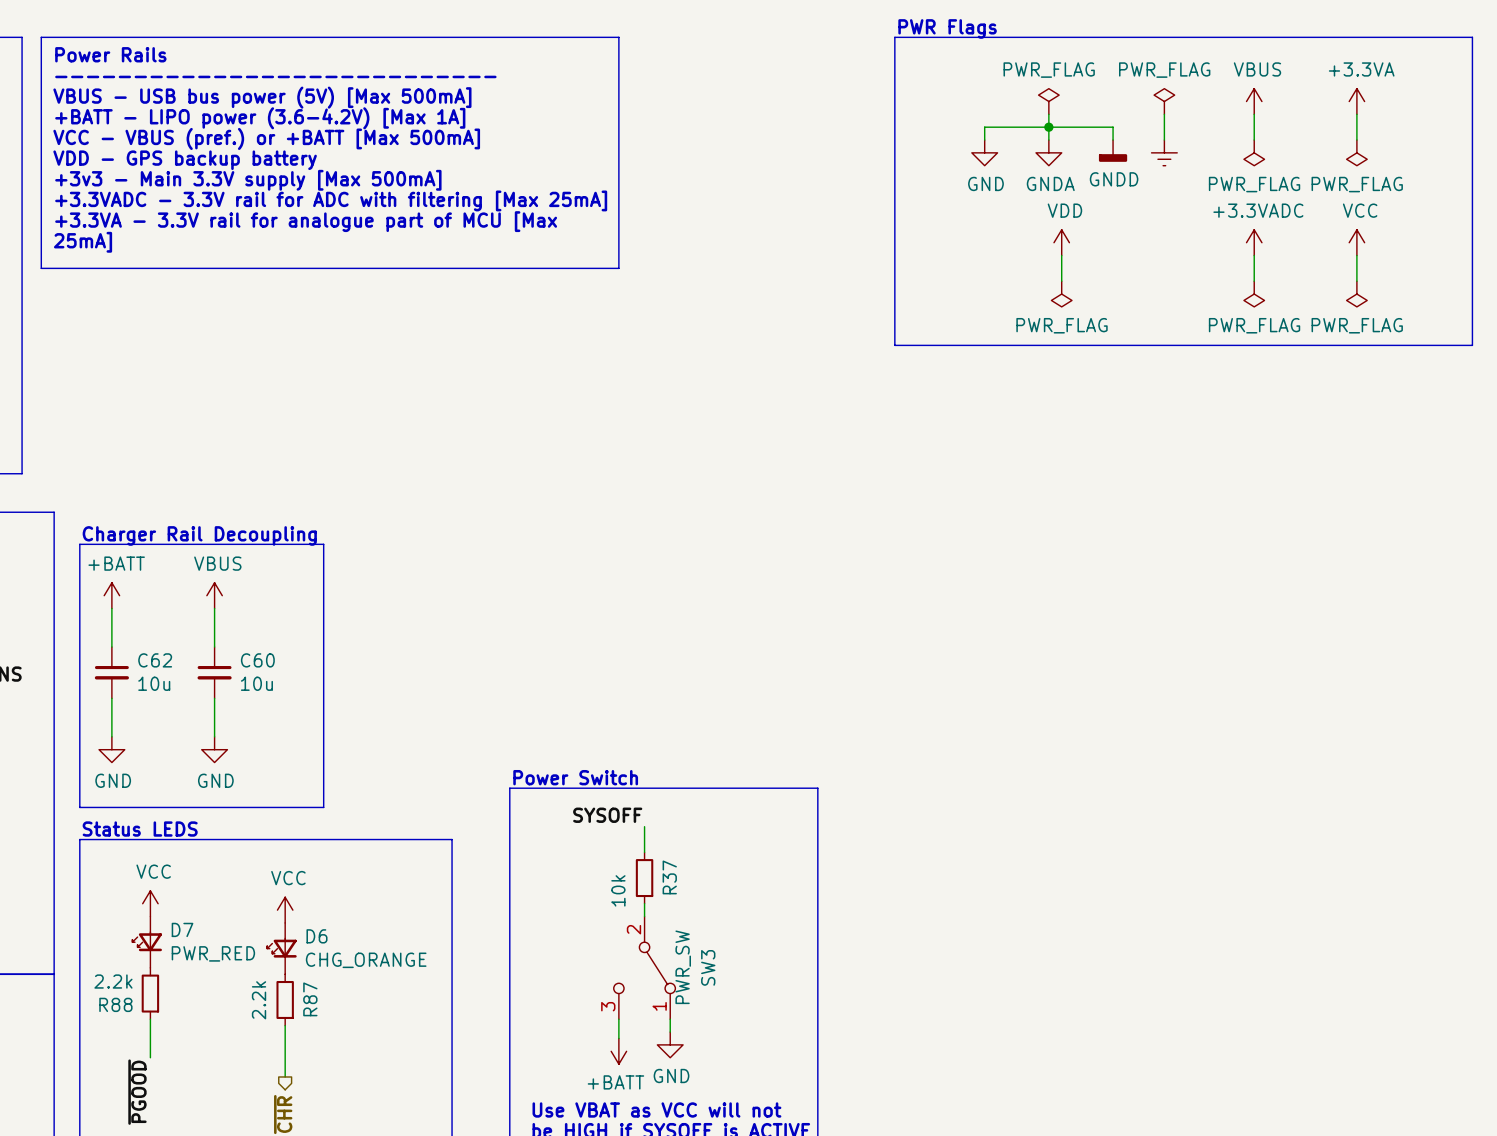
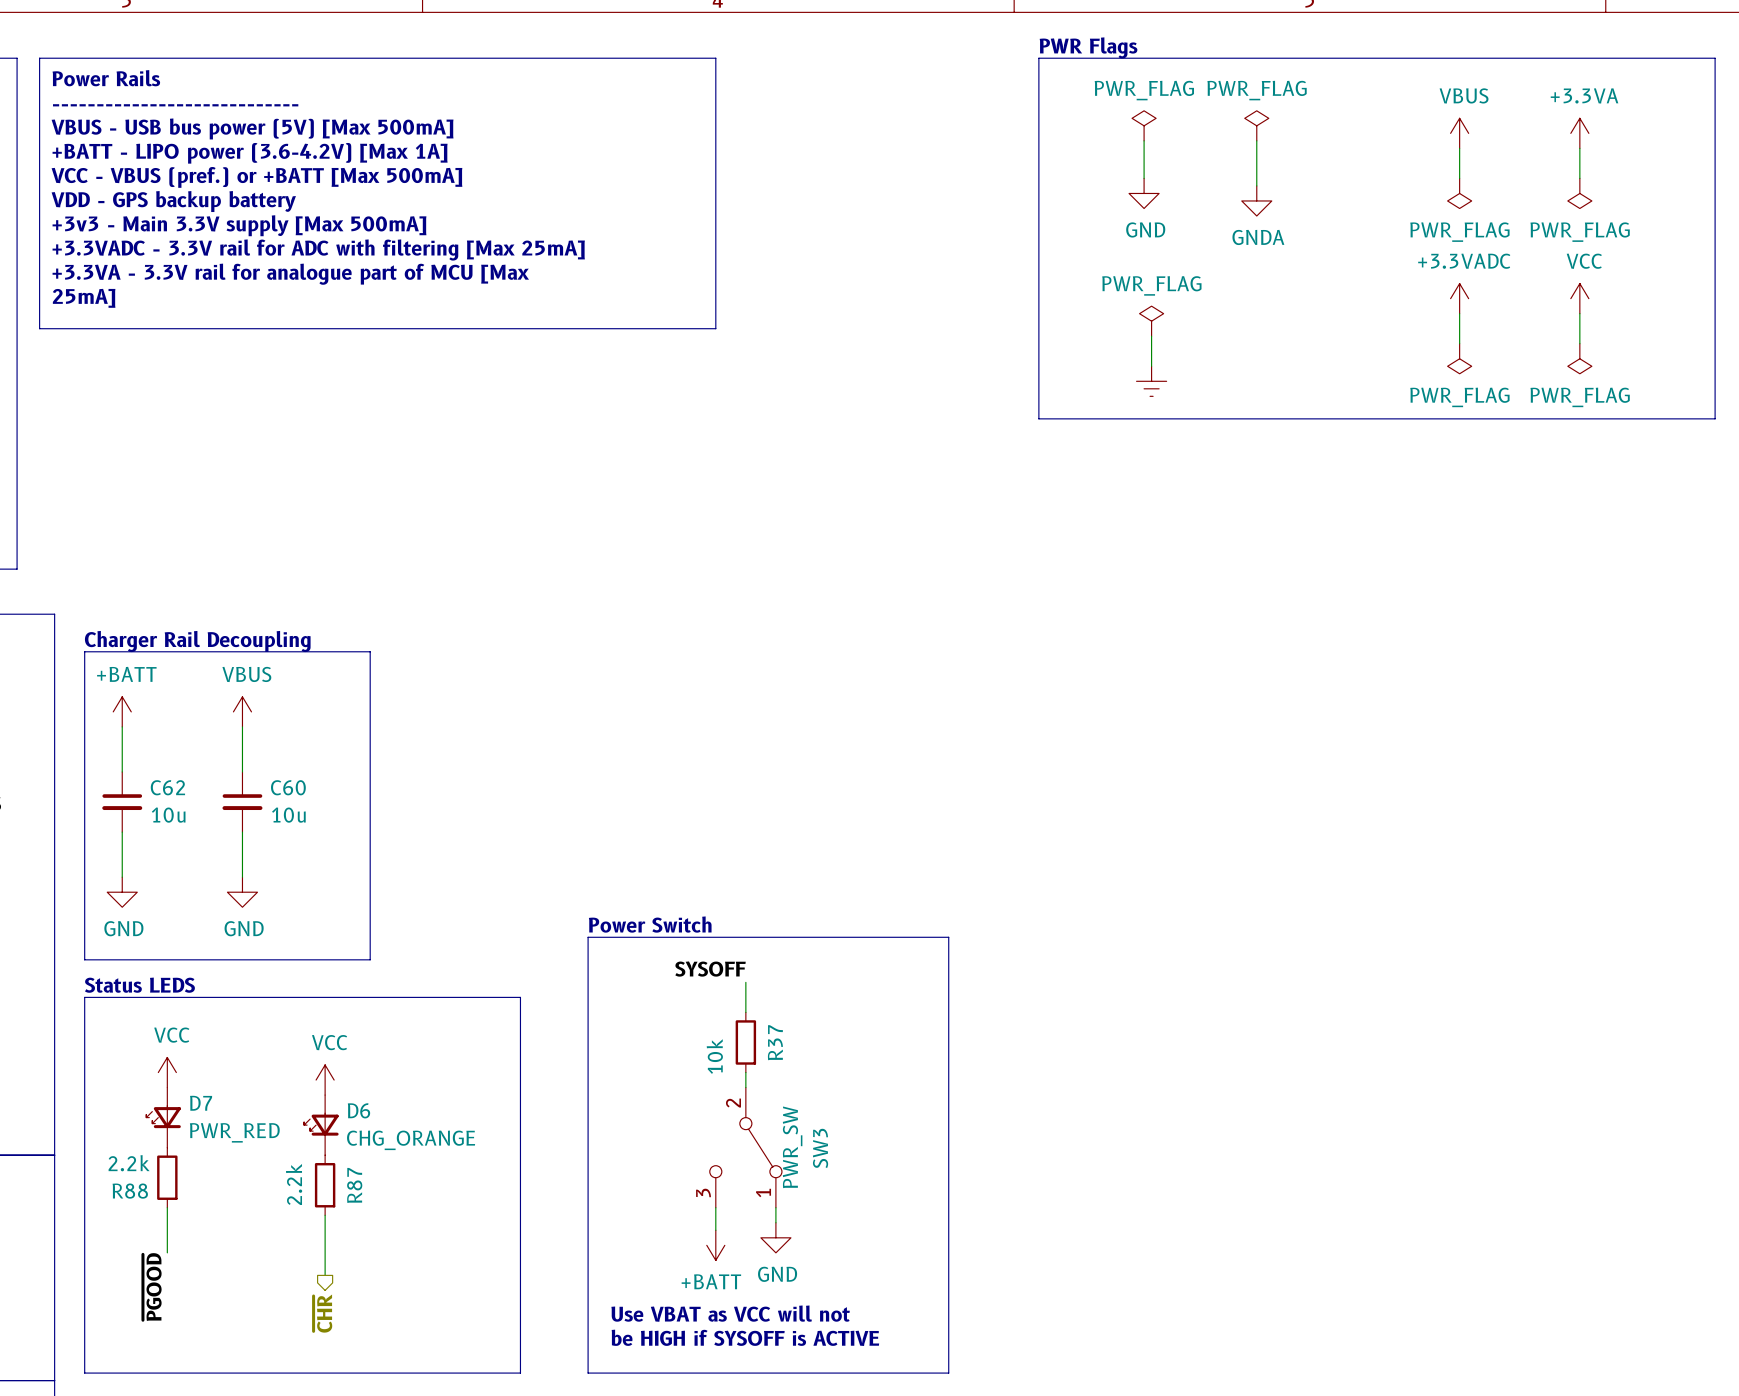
power symbol: none -> PWR_FLAG (1144, 125)
power symbol: none -> PWR_FLAG (1256, 125)
power symbol: PWR_FLAG (1048, 101) -> none
power symbol: PWR_FLAG (1164, 101) -> none
wire: none -> (1256, 140) (1256, 185)
wire: (1048, 114) (1048, 140) -> none
wire: (1164, 114) (1164, 140) -> none
wire: (984, 127) (1113, 127) (1113, 140) -> (1144, 163) (1144, 140)
junction: (1048, 127) -> none
power symbol: GNDD (1113, 150) -> none
power symbol position: GNDA (1048, 152) -> GNDA (1256, 200)
power symbol position: (1164, 152) -> (1151, 381)
power symbol: VDD (1061, 242) -> none
wire: (1061, 255) (1061, 281) -> (1151, 336) (1151, 366)
power symbol rotation: 0° (1061, 294) -> 180° (1151, 321)
power symbol position: PWR_FLAG (1061, 294) -> PWR_FLAG (1151, 321)

